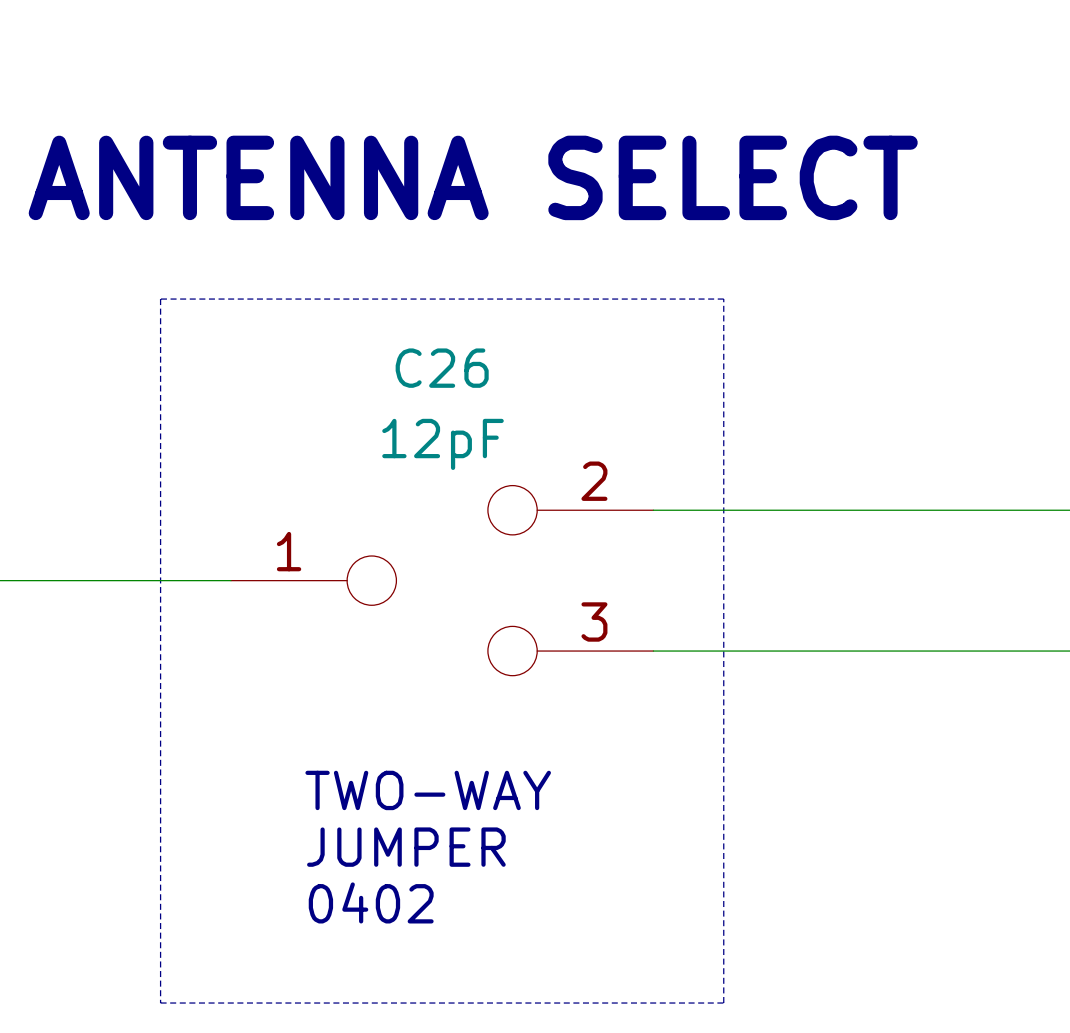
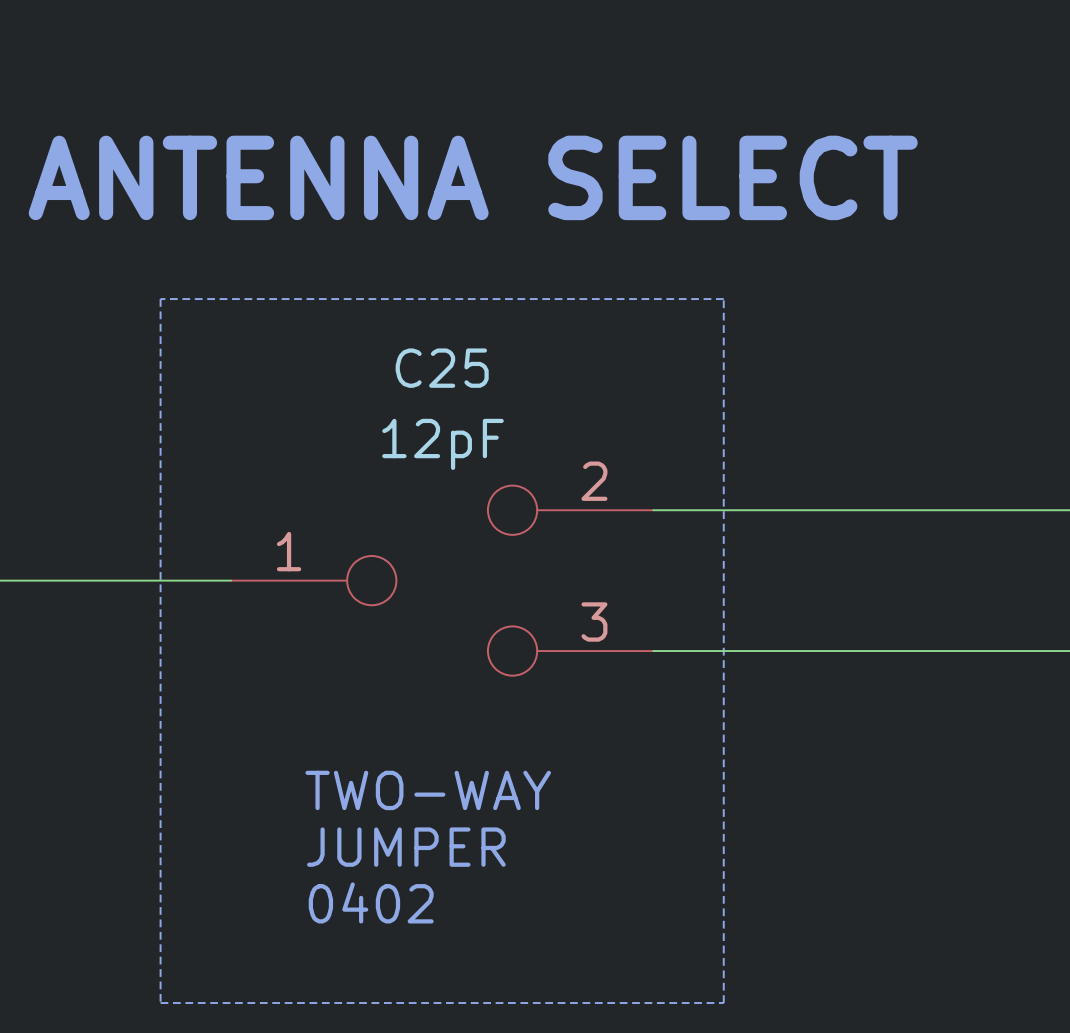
C26 name: C26 (442, 368) -> C25 (442, 368)

